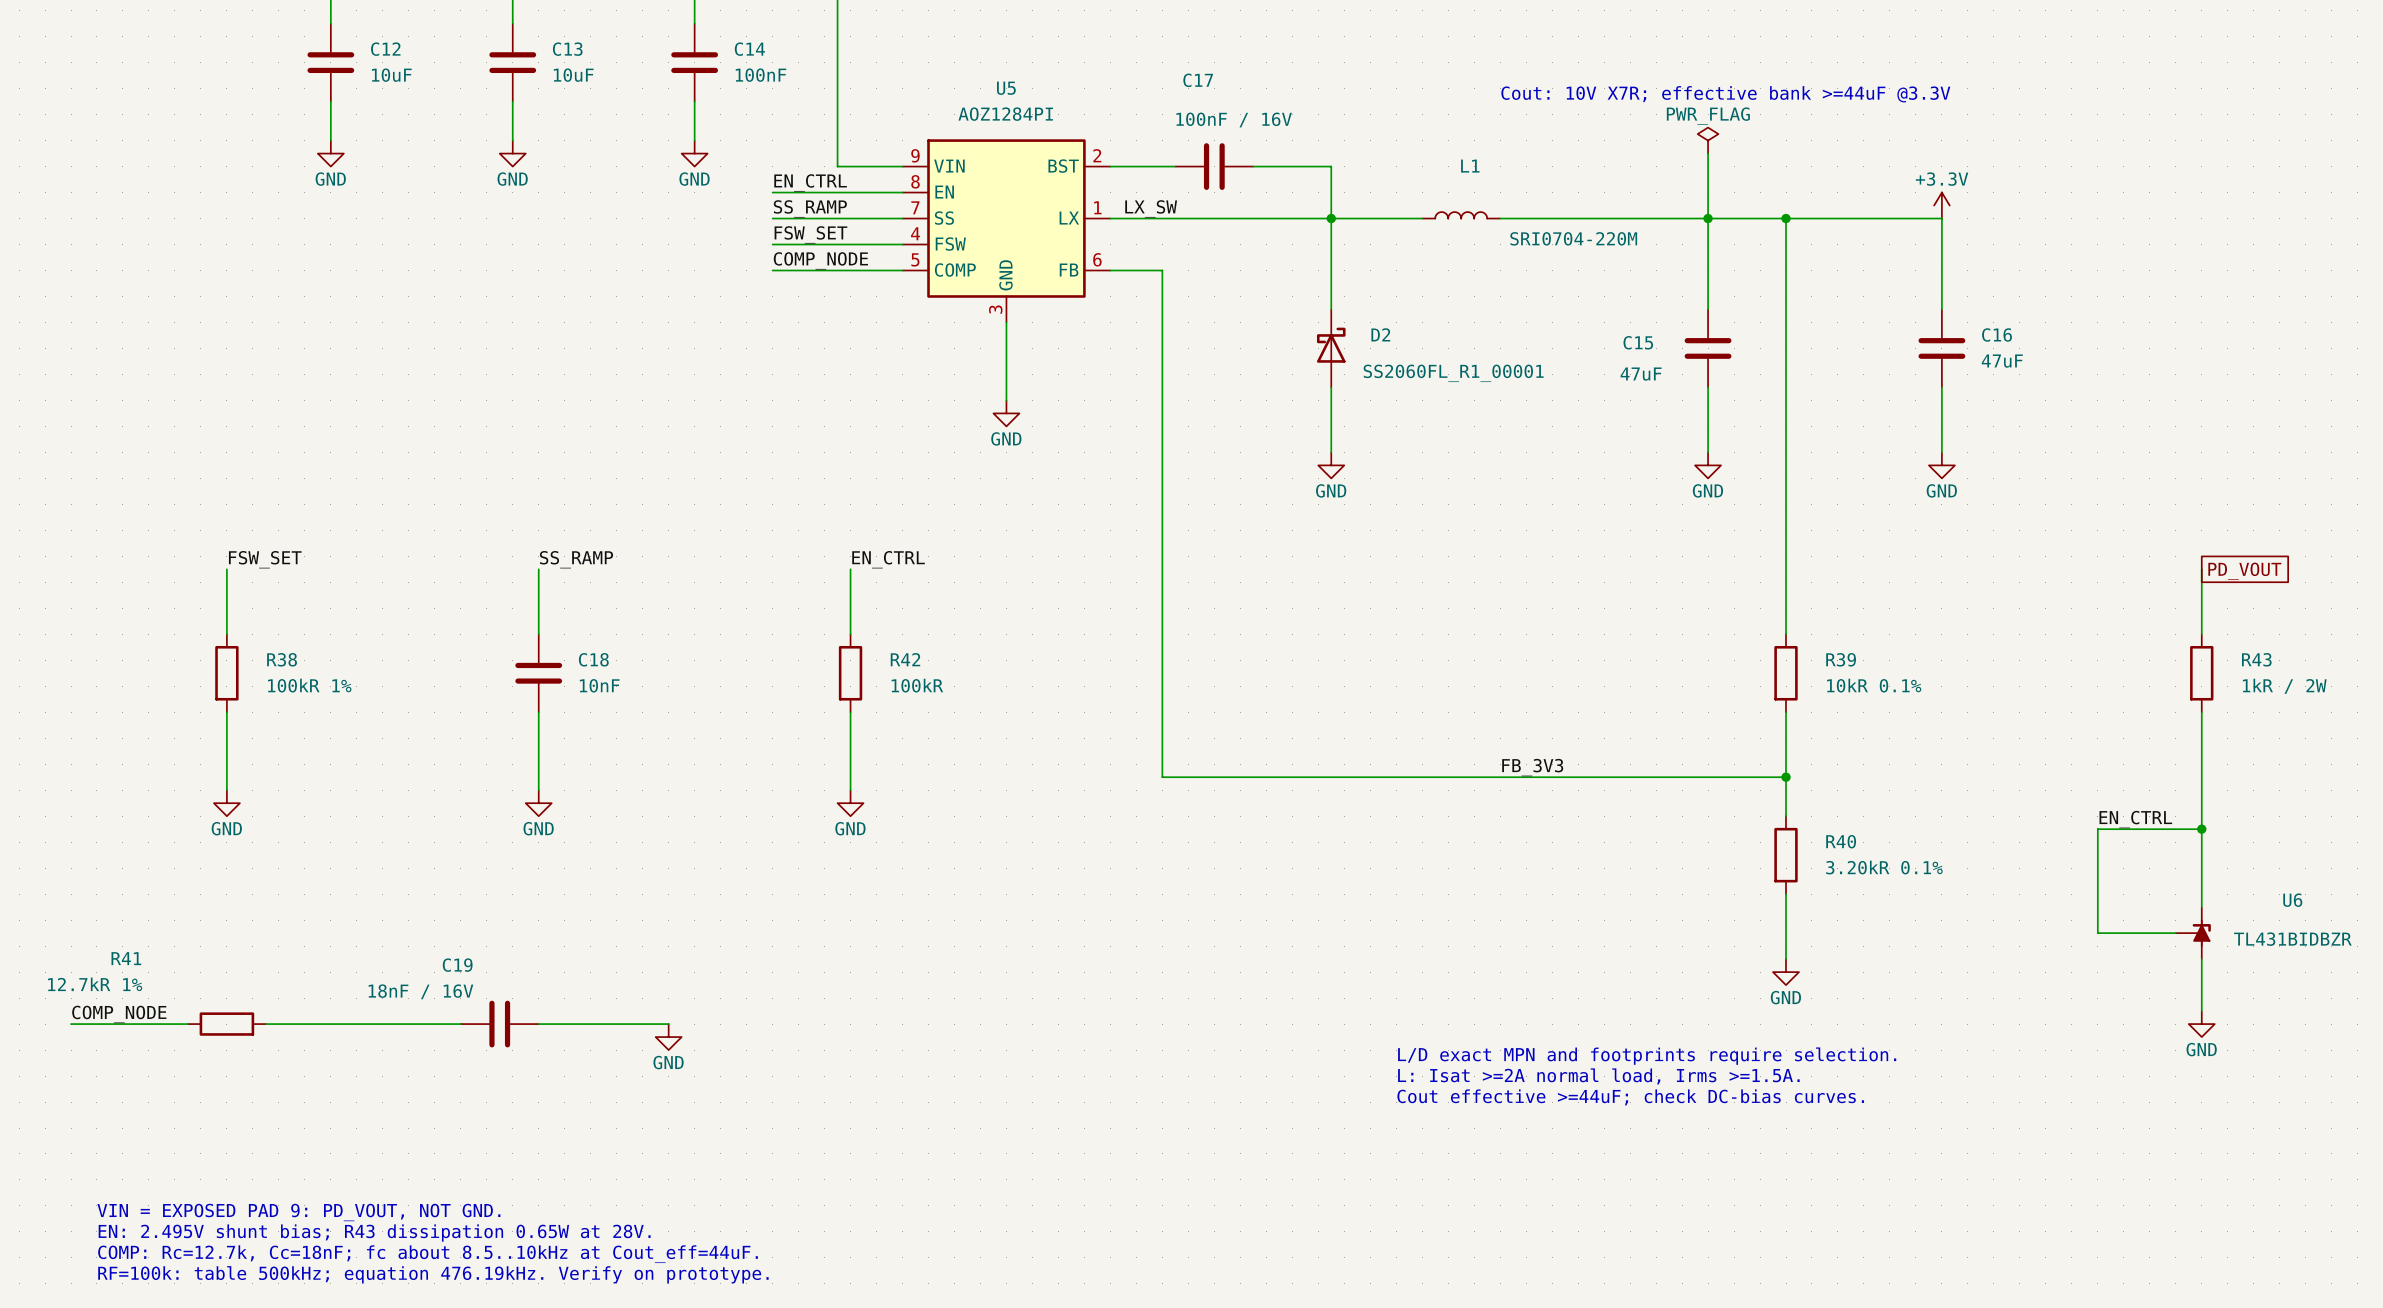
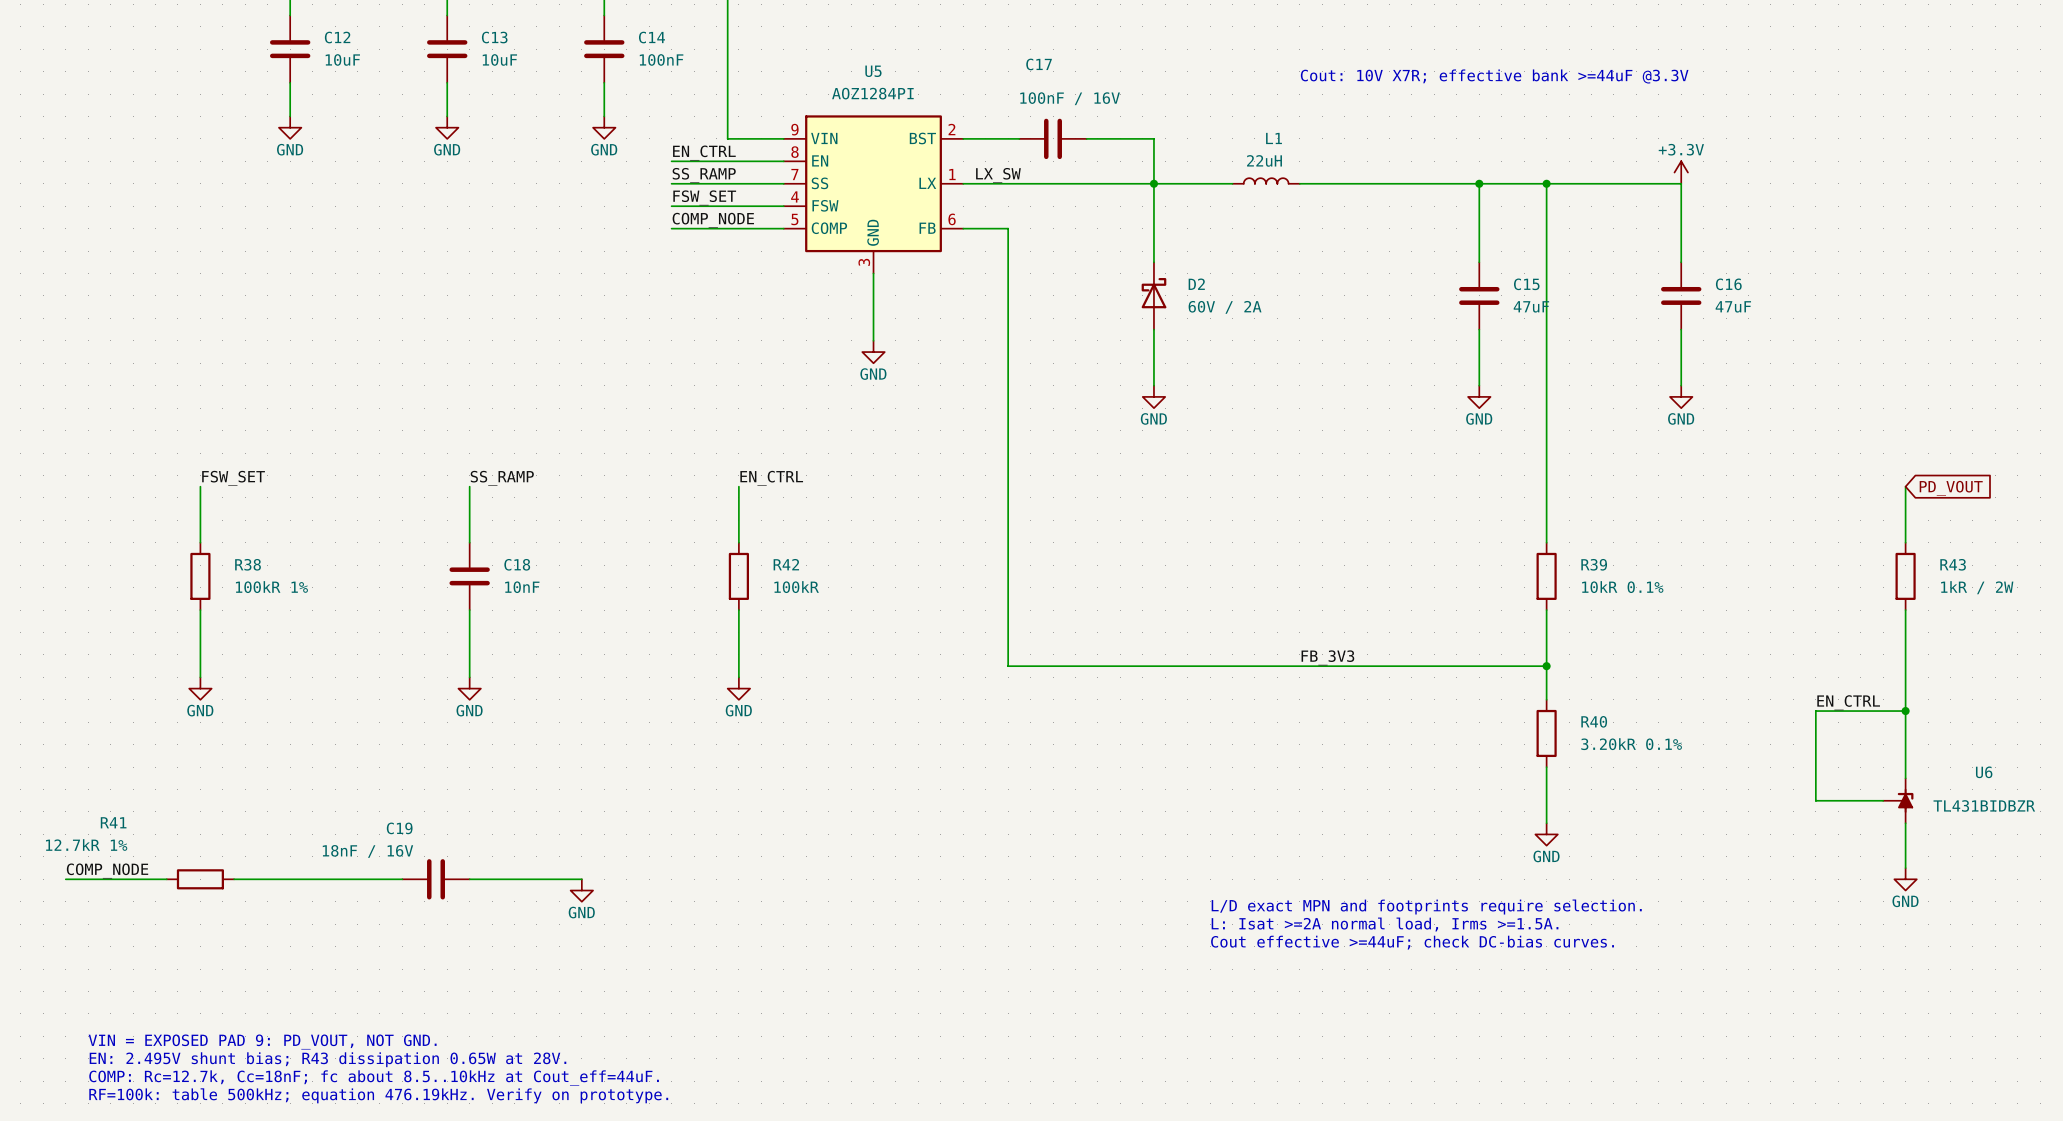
power symbol: PWR_FLAG (1708, 140) -> none
wire: (1708, 153) (1708, 218) -> none
L1 value: SRI0704-220M (1573, 238) -> 22uH (1264, 160)
C15 name position: C15 (1638, 342) -> C15 (1526, 284)
D2 value: SS2060FL_R1_00001 (1453, 373) -> 60V / 2A (1225, 307)
C15 value position: 47uF (1641, 374) -> 47uF (1531, 306)
global label shape: passive (2244, 571) -> input (1951, 488)

